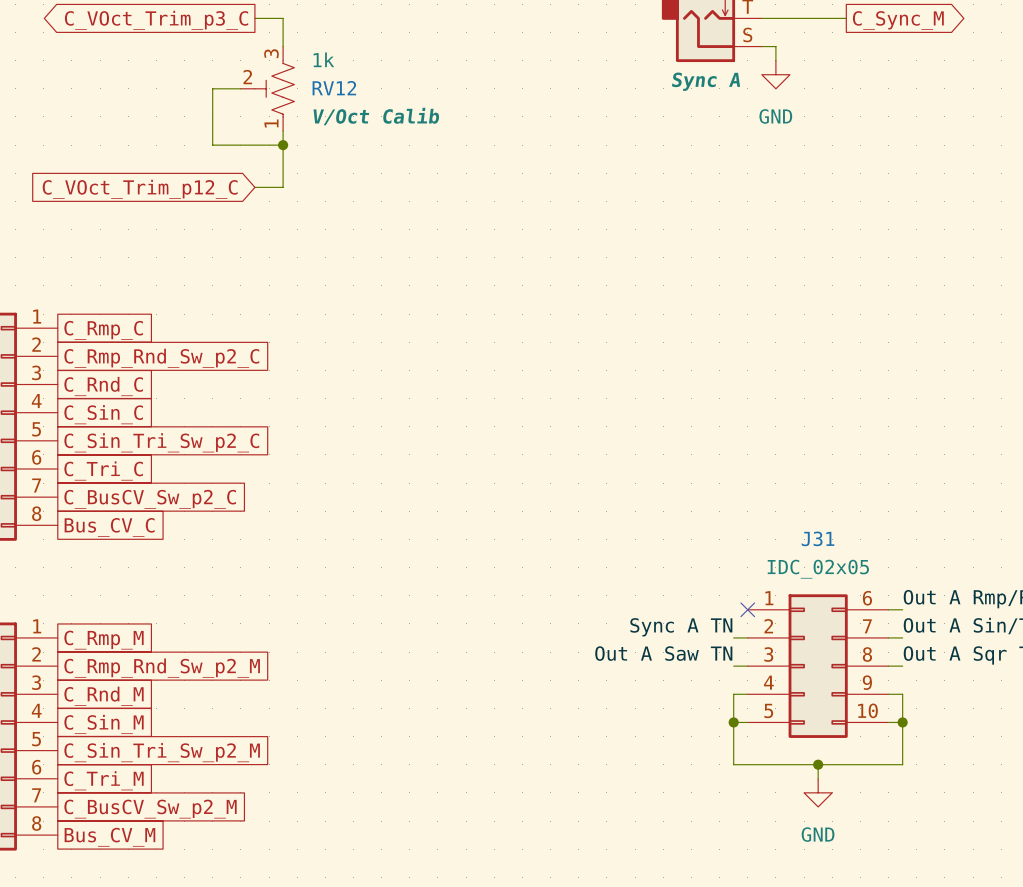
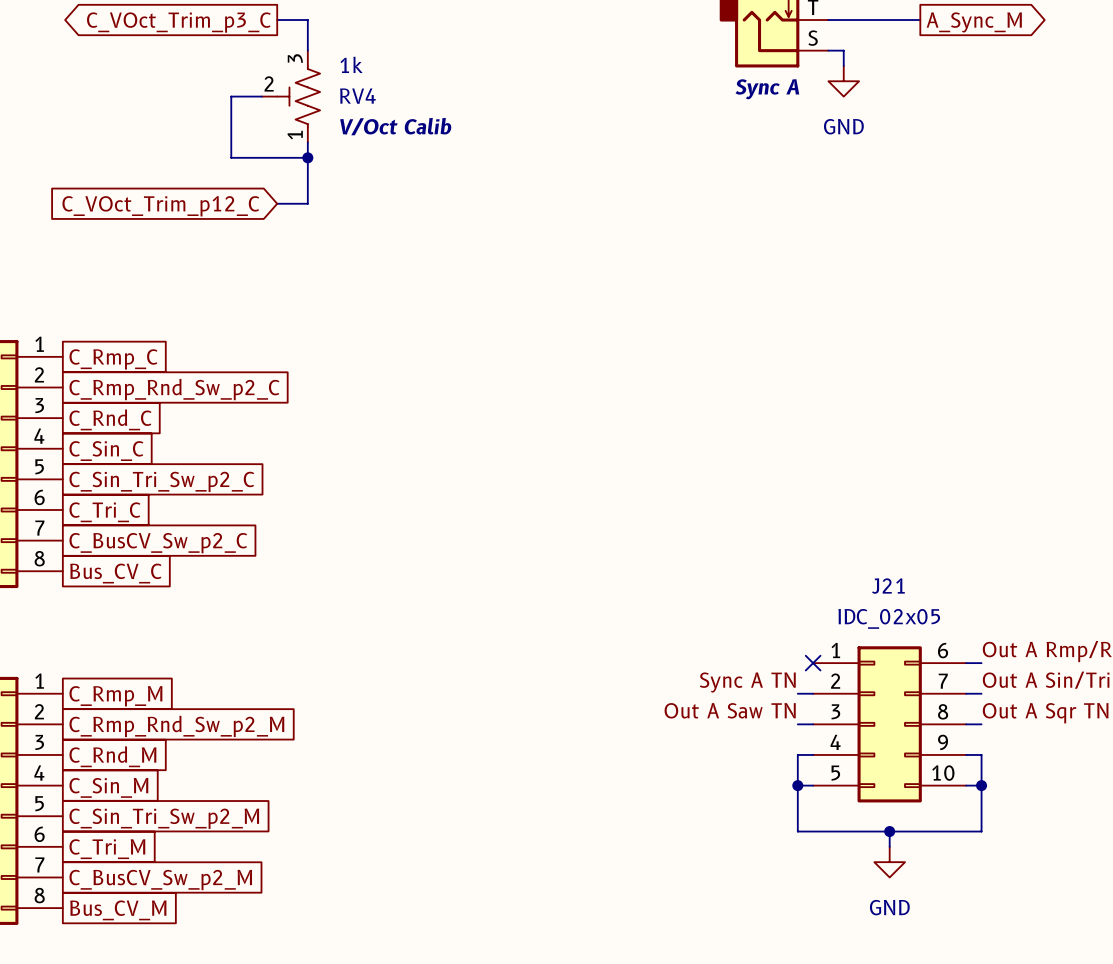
global label: C_Sync_M (898, 20) -> A_Sync_M (974, 22)
RV12 name: RV12 (334, 88) -> RV4 (357, 96)
J31 name: J31 (818, 538) -> J21 (888, 586)

